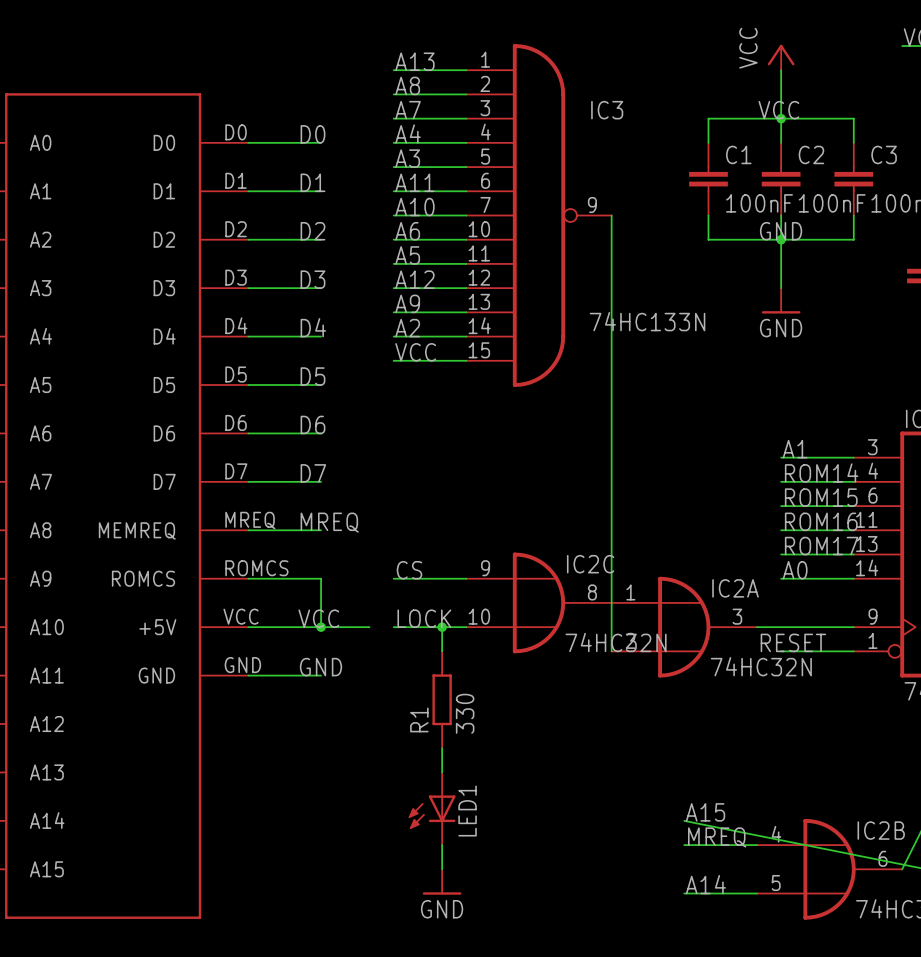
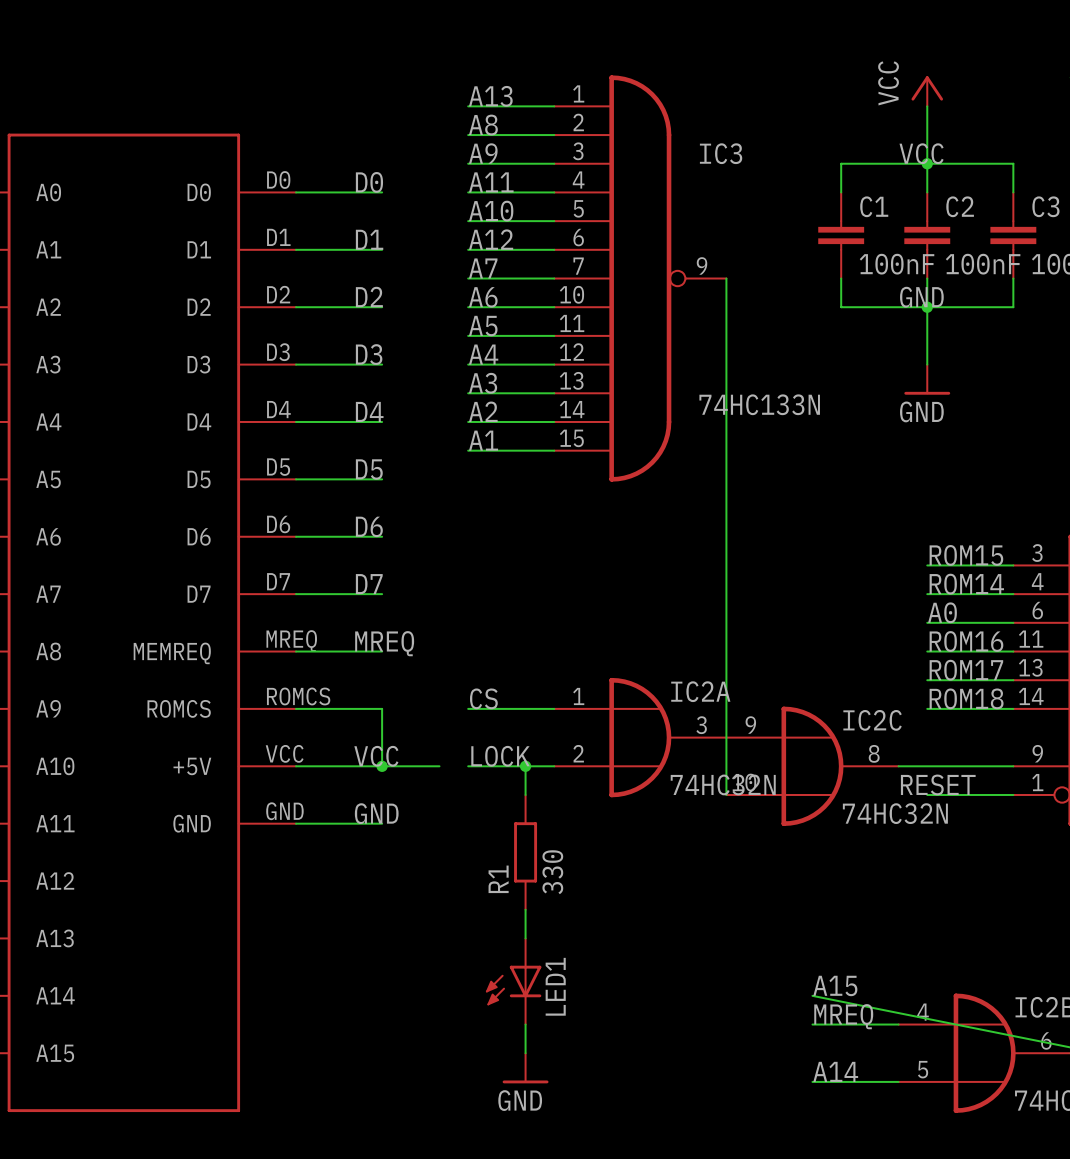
label: A7 (408, 110) -> A9 (483, 153)
label: A4 (408, 133) -> A11 (491, 182)
label: A3 (407, 158) -> A10 (491, 211)
label: A11 (414, 182) -> A12 (491, 239)
label: A10 (414, 207) -> A7 (483, 268)
label: A12 (414, 279) -> A4 (483, 354)
label: A9 (407, 303) -> A3 (483, 383)
label: VCC (415, 352) -> A1 (483, 440)
label: A1 (795, 449) -> ROM15 (966, 555)
label: ROM15 (821, 497) -> A0 (942, 612)
label: A0 (795, 570) -> ROM18 (966, 698)
IC2C position: (538, 602) -> (812, 766)
IC2A position: (684, 627) -> (640, 737)

